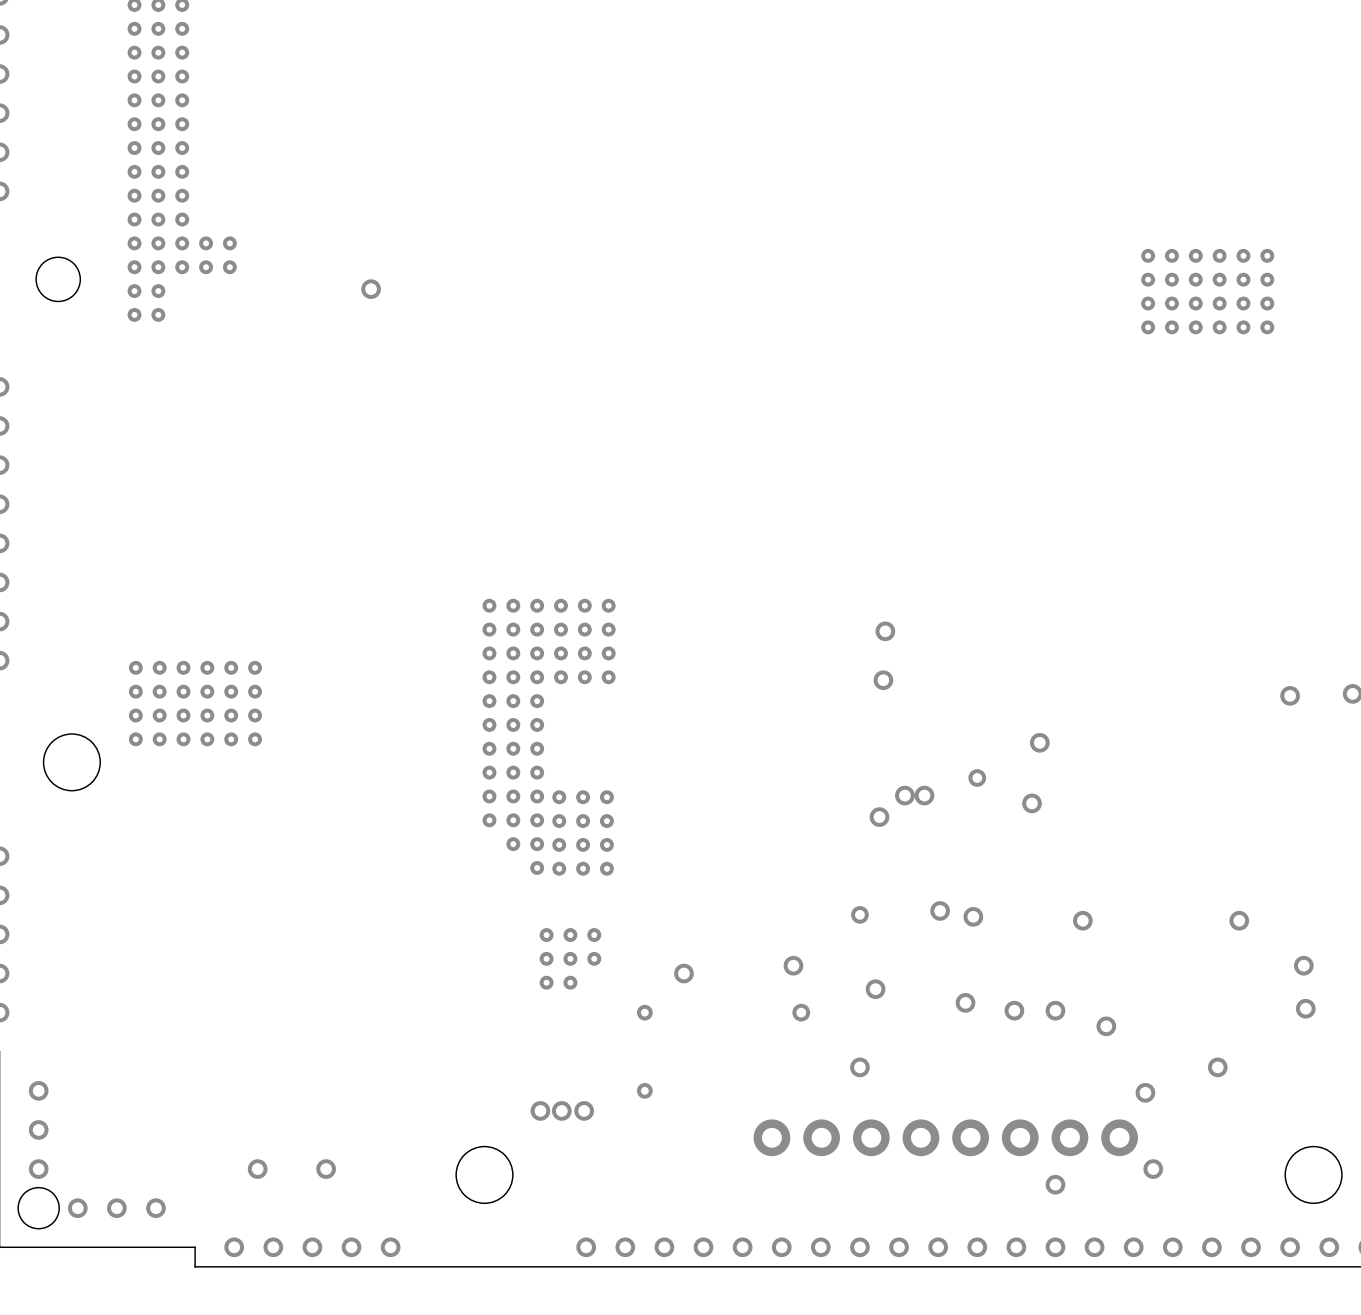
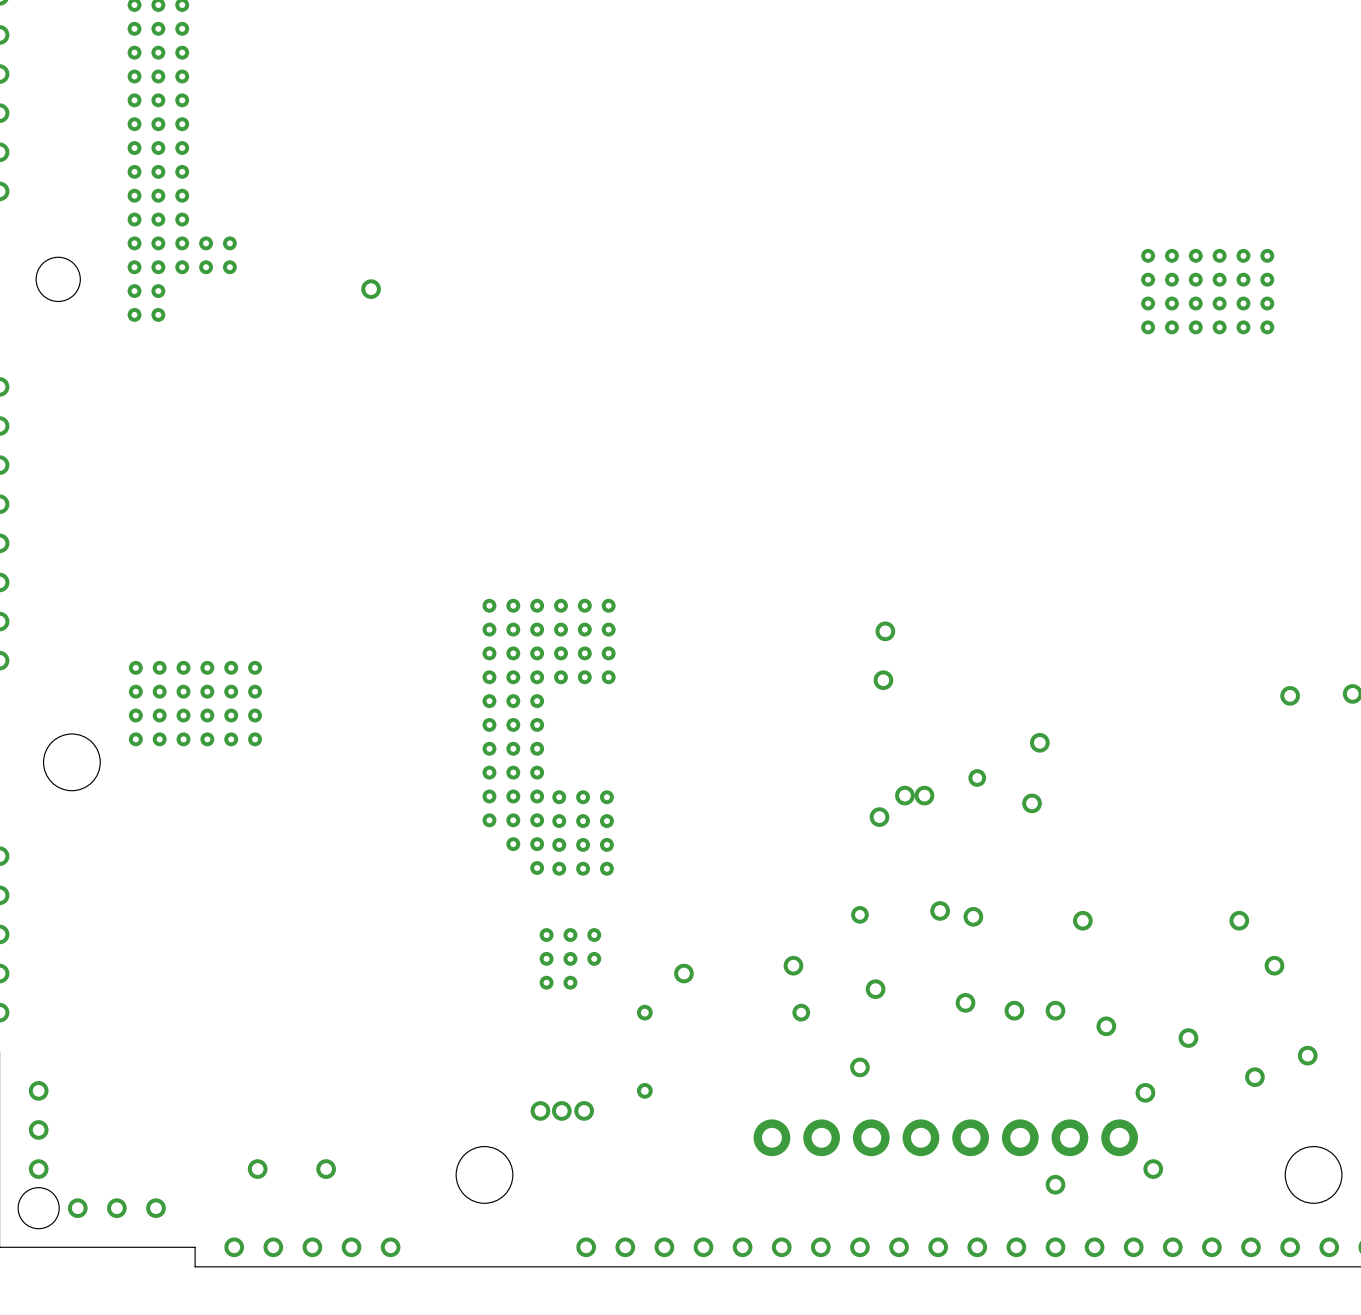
via: none -> (1274, 965)
via: (1303, 965) -> none
via: (1305, 1008) -> none
via: none -> (1188, 1038)
via: none -> (1307, 1055)
via: (1217, 1067) -> none
via: none -> (1254, 1077)

